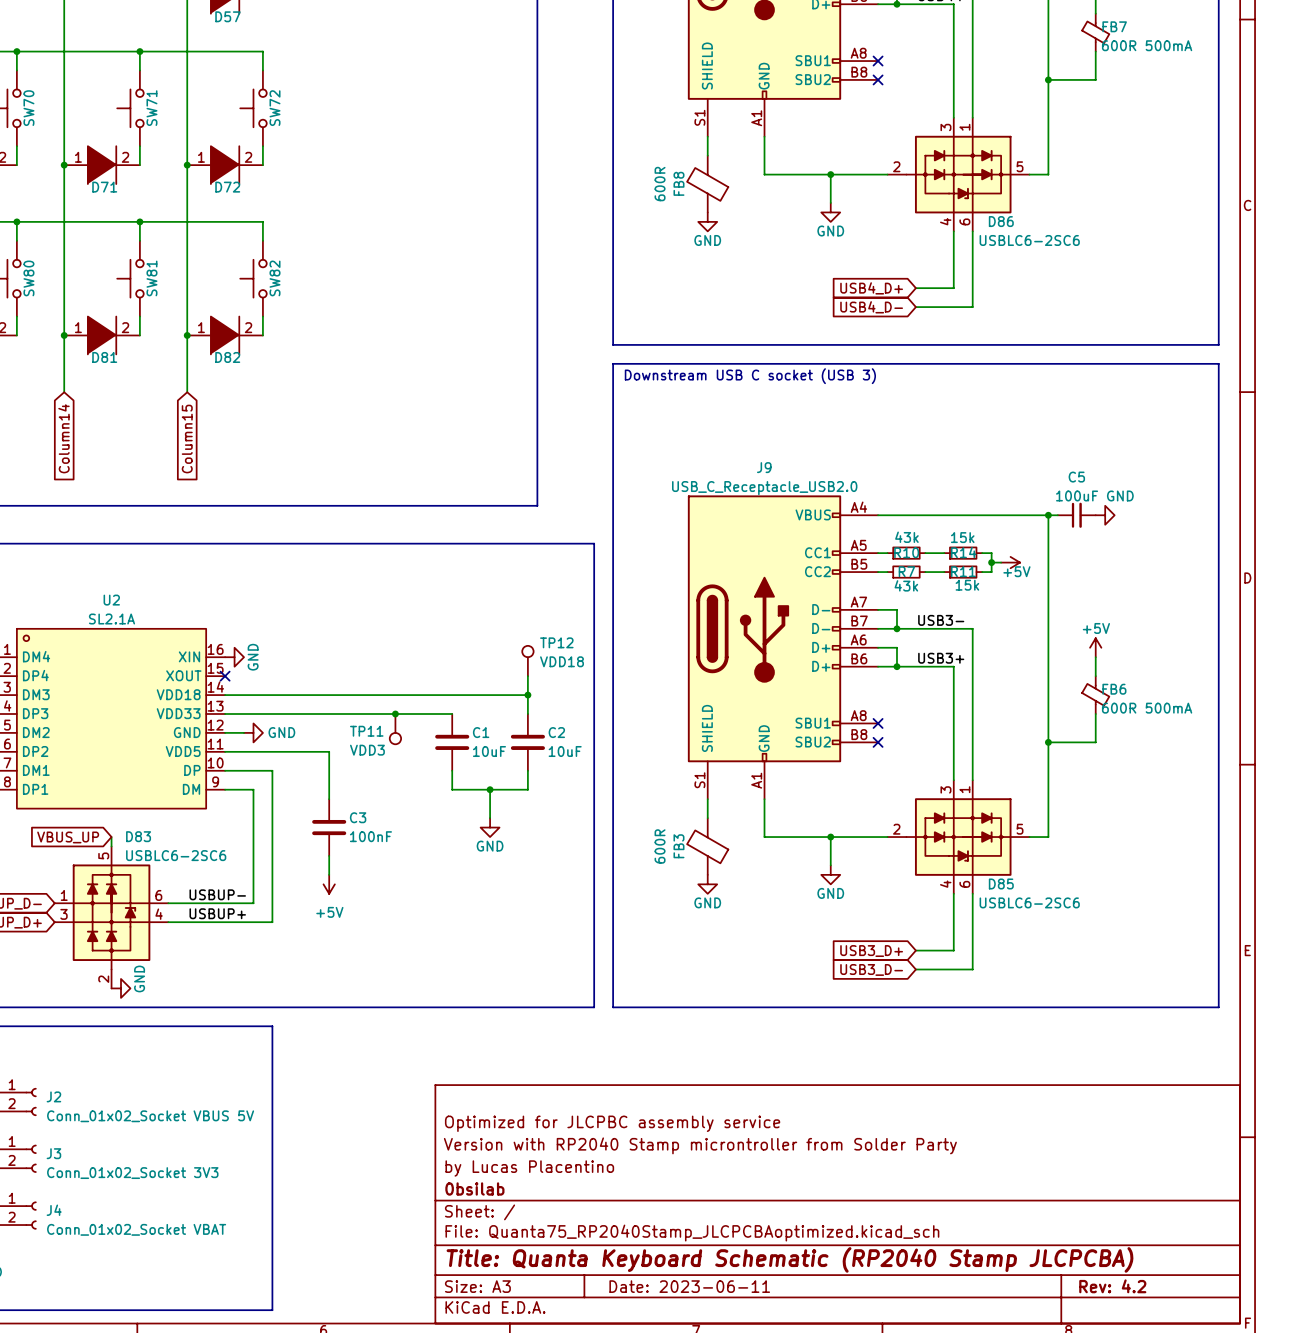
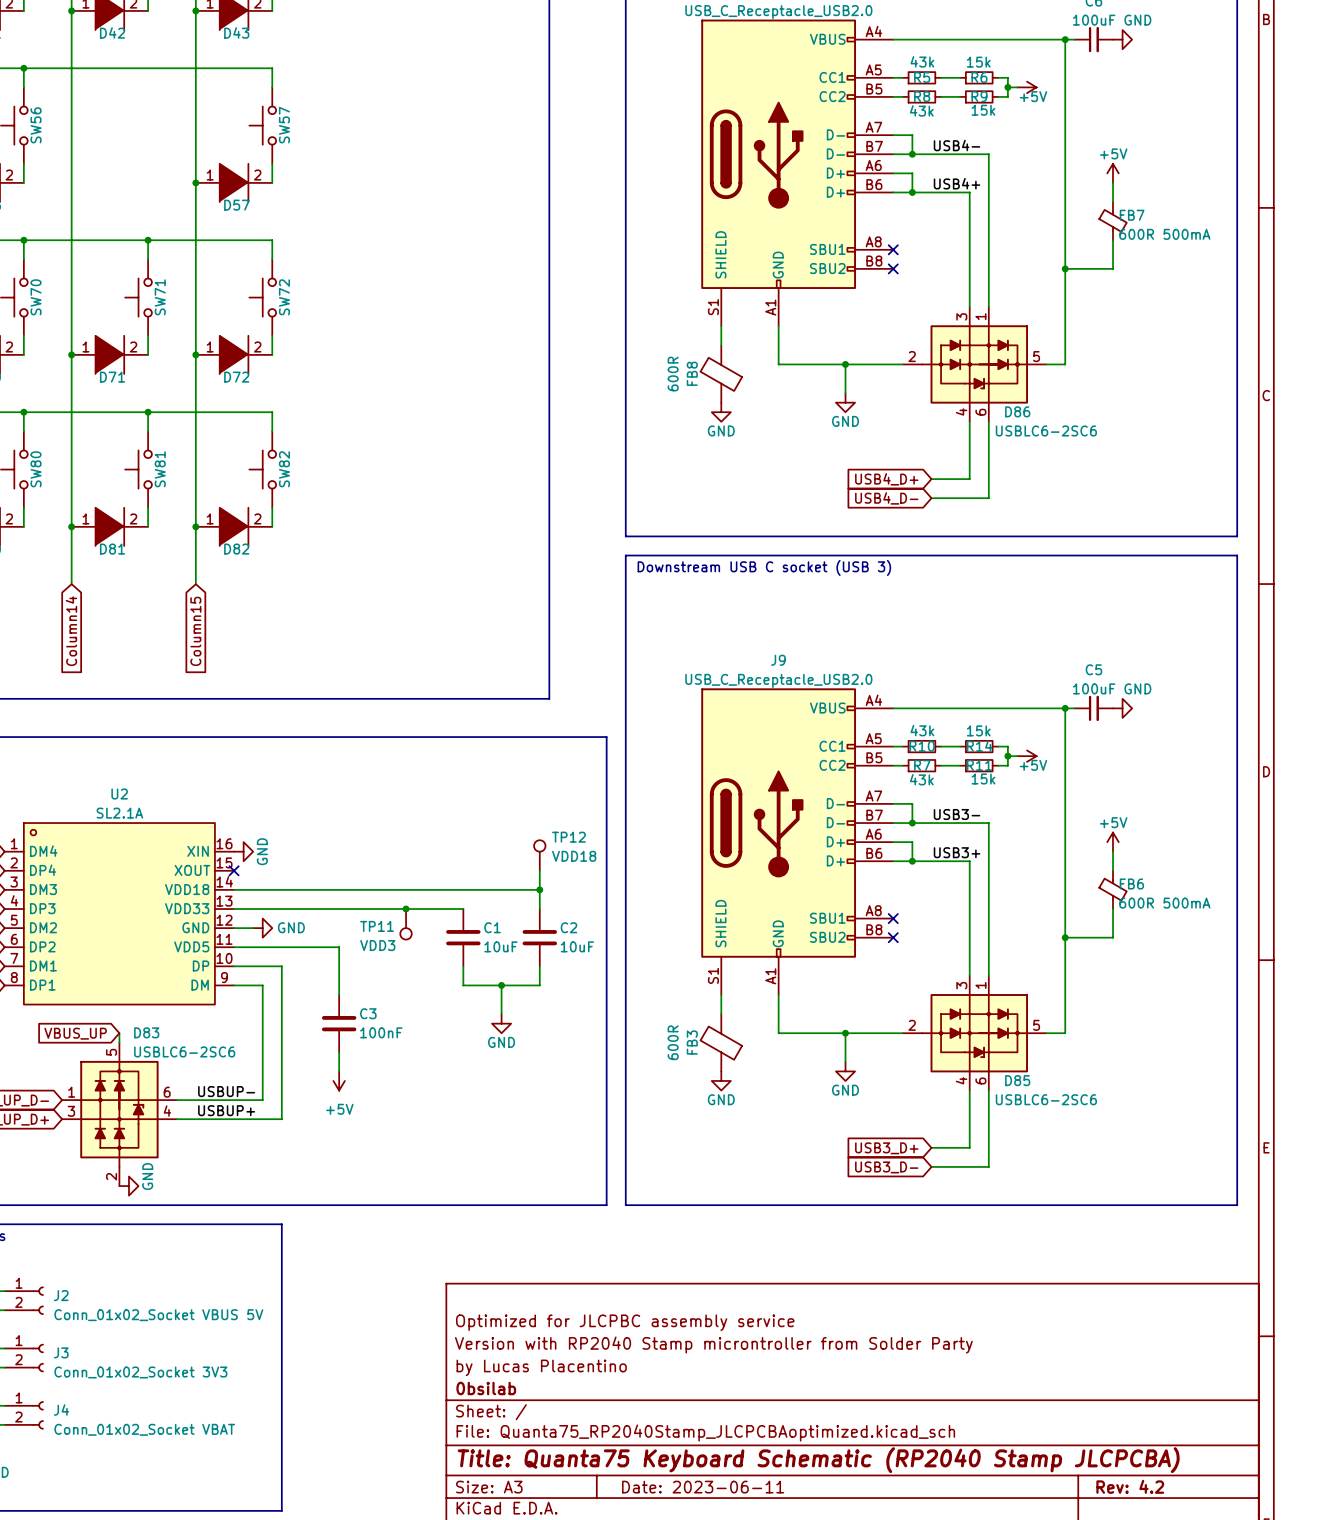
title block: Title: Quanta Keyboard Schematic (RP2040 Stamp JLCPCBA) (789, 1259) -> Title: Quanta75 Keyboard Schematic (RP2040 Stamp JLCPCBA) (818, 1460)

